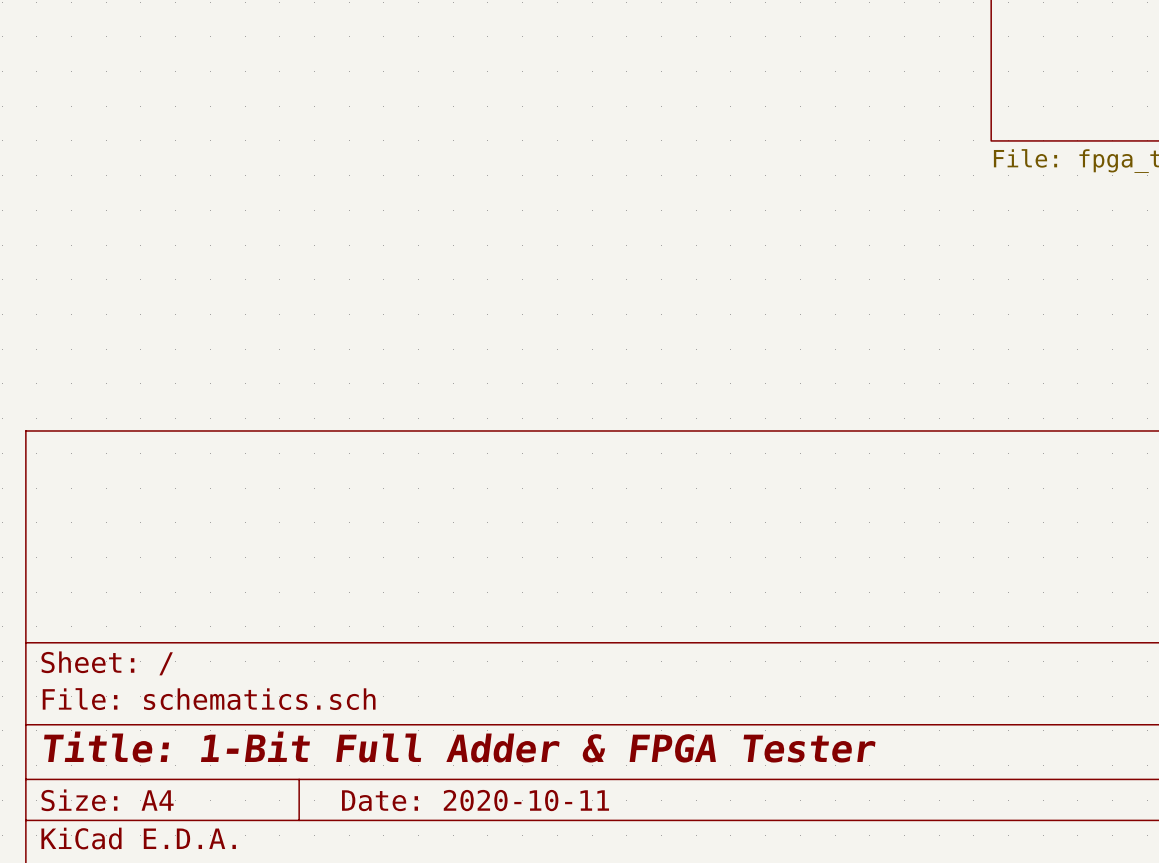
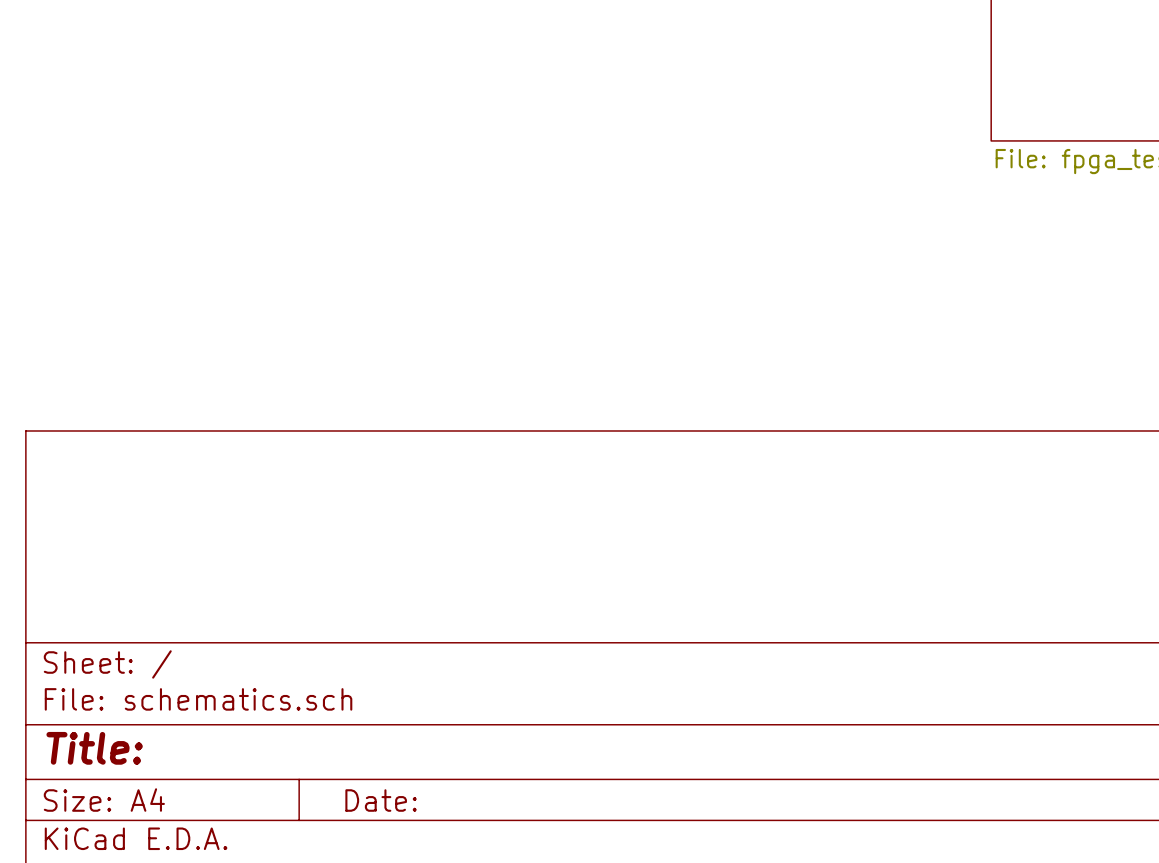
title block: Title: 1-Bit Full Adder & FPGA Tester (459, 747) -> Title: (94, 748)
title block: Date: 2020-10-11 (475, 800) -> Date: (381, 800)

